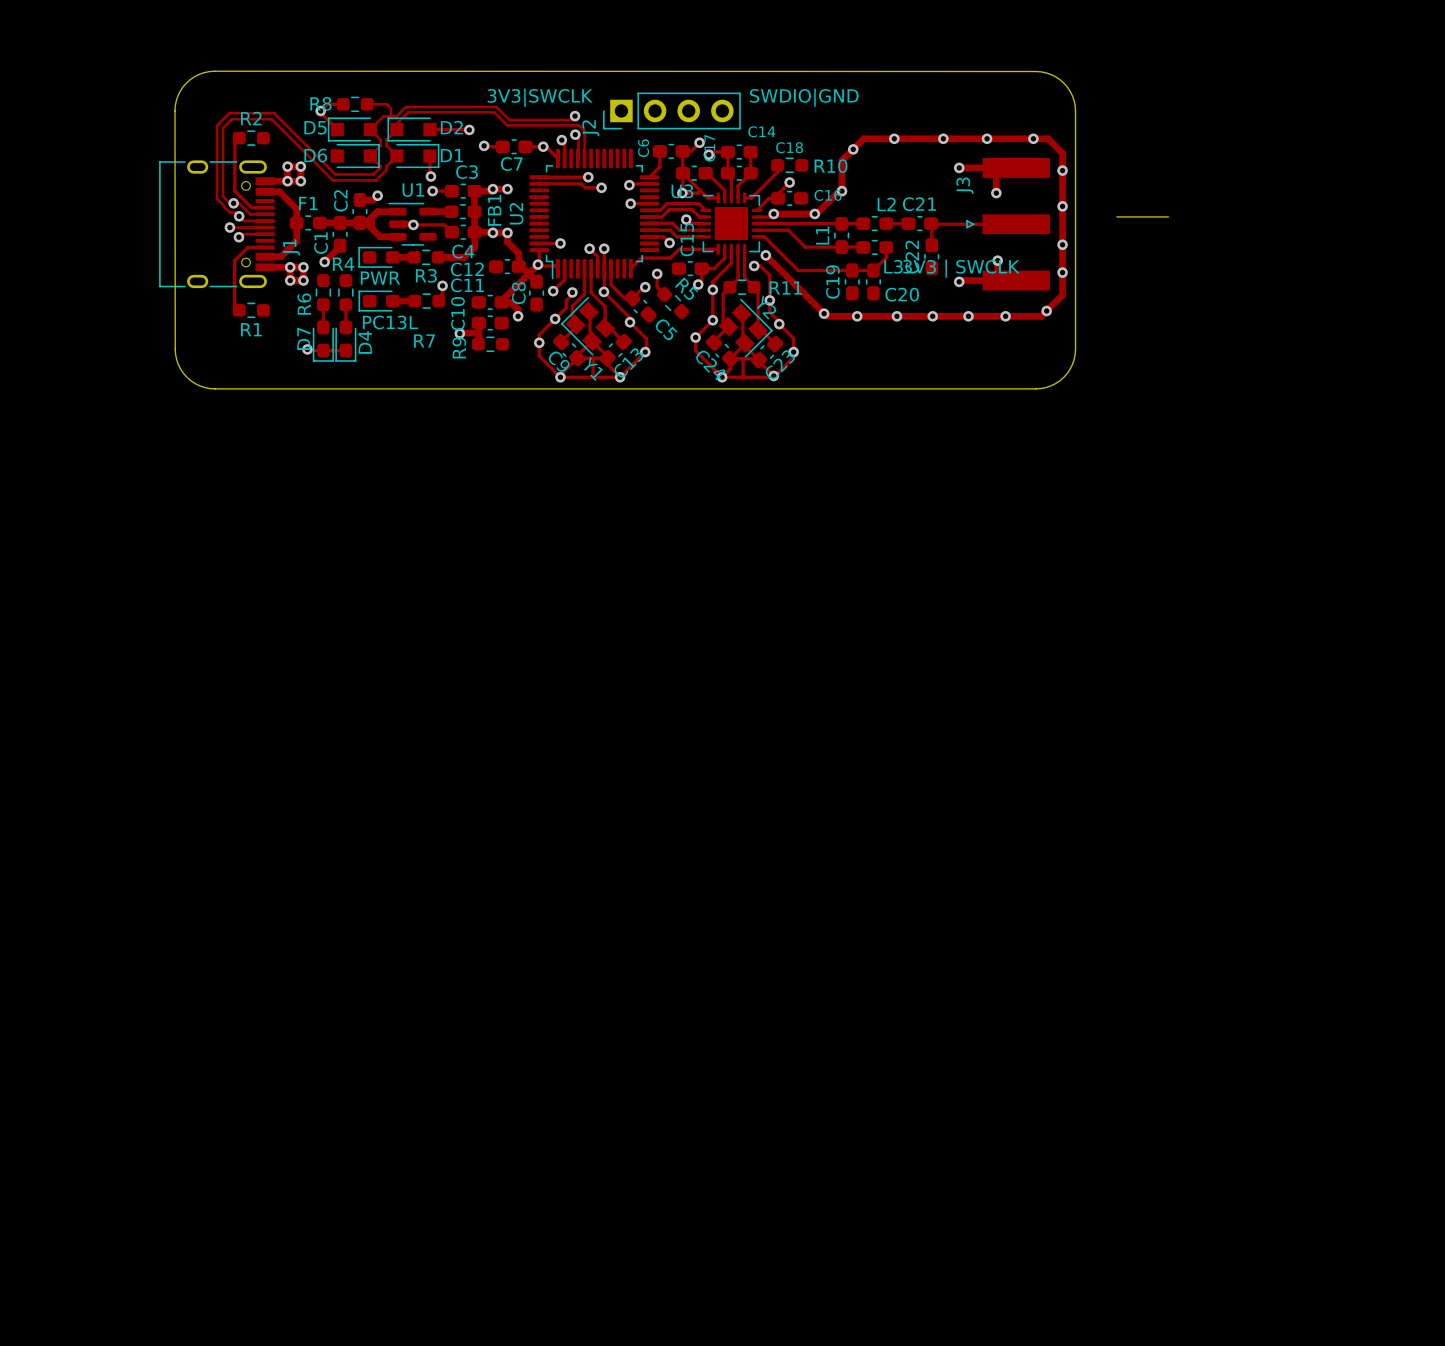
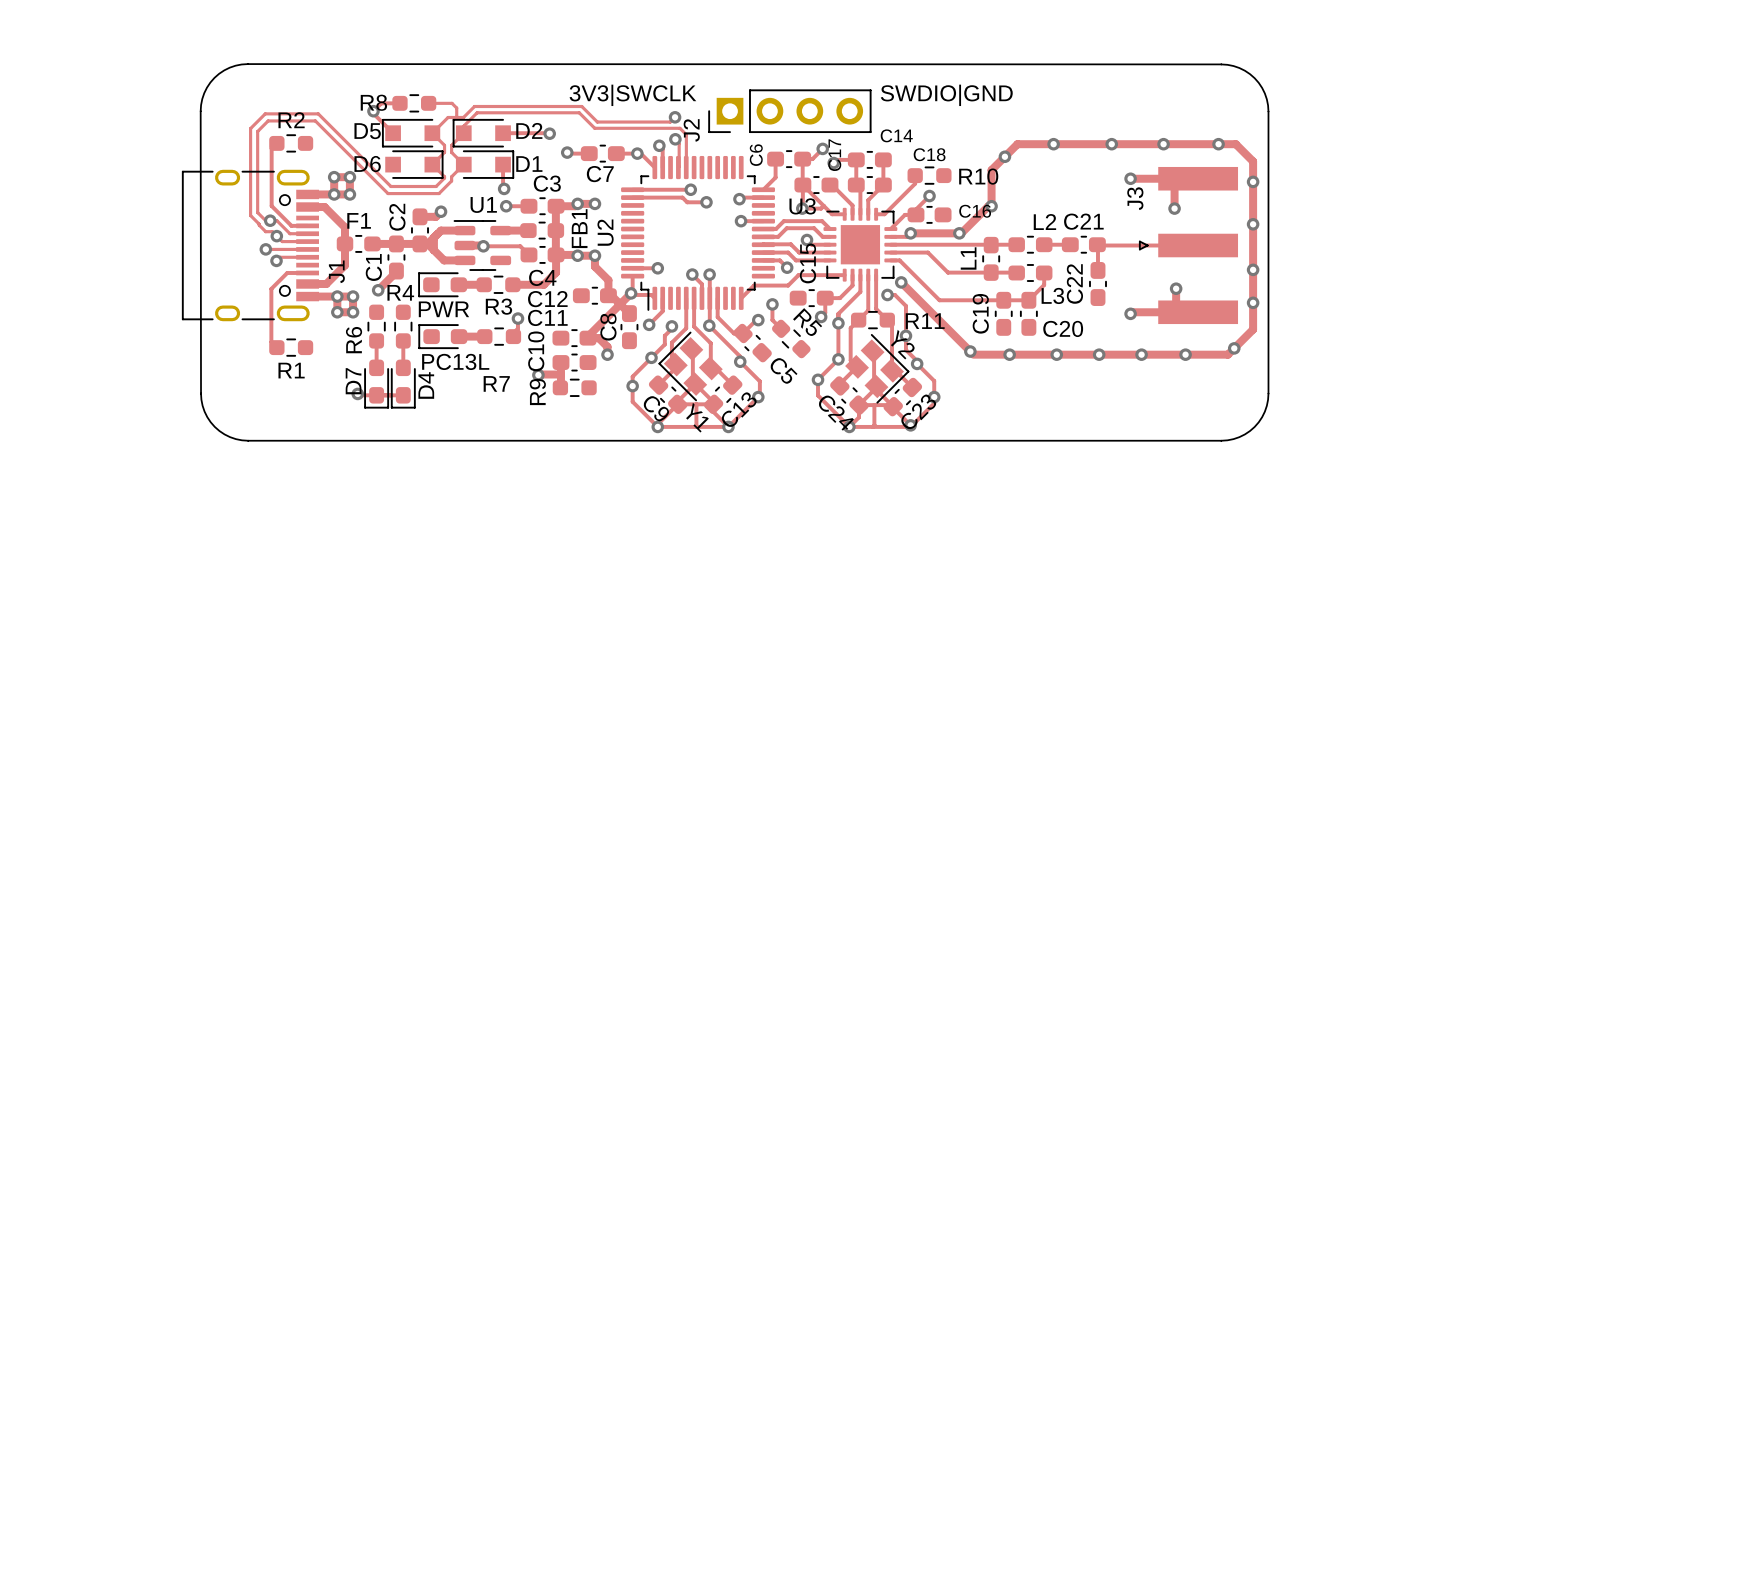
board edge: (1116, 216) (1168, 216) -> none
text: 3V3 | SWCLK (961, 268) -> none

